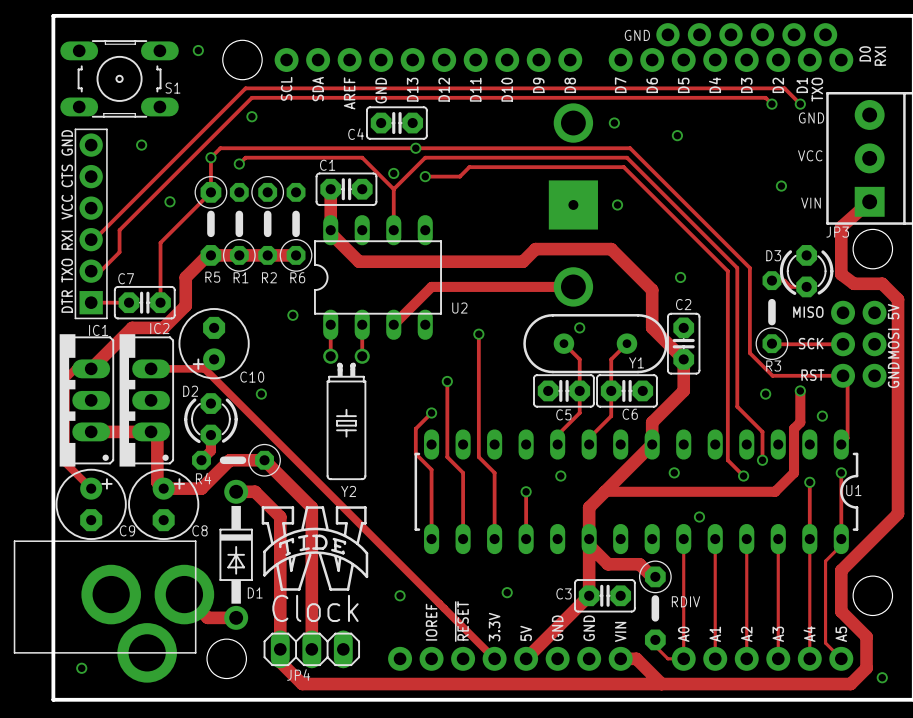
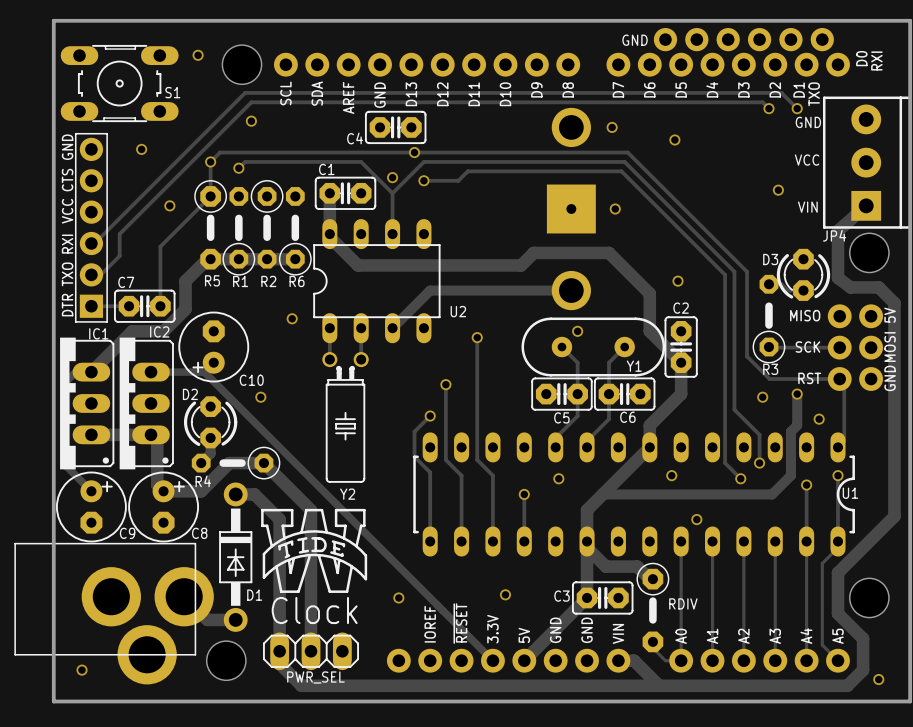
JP3 name: JP3 (837, 232) -> JP4 (834, 235)
JP4 name: JP4 (298, 674) -> PWR_SEL (315, 677)

